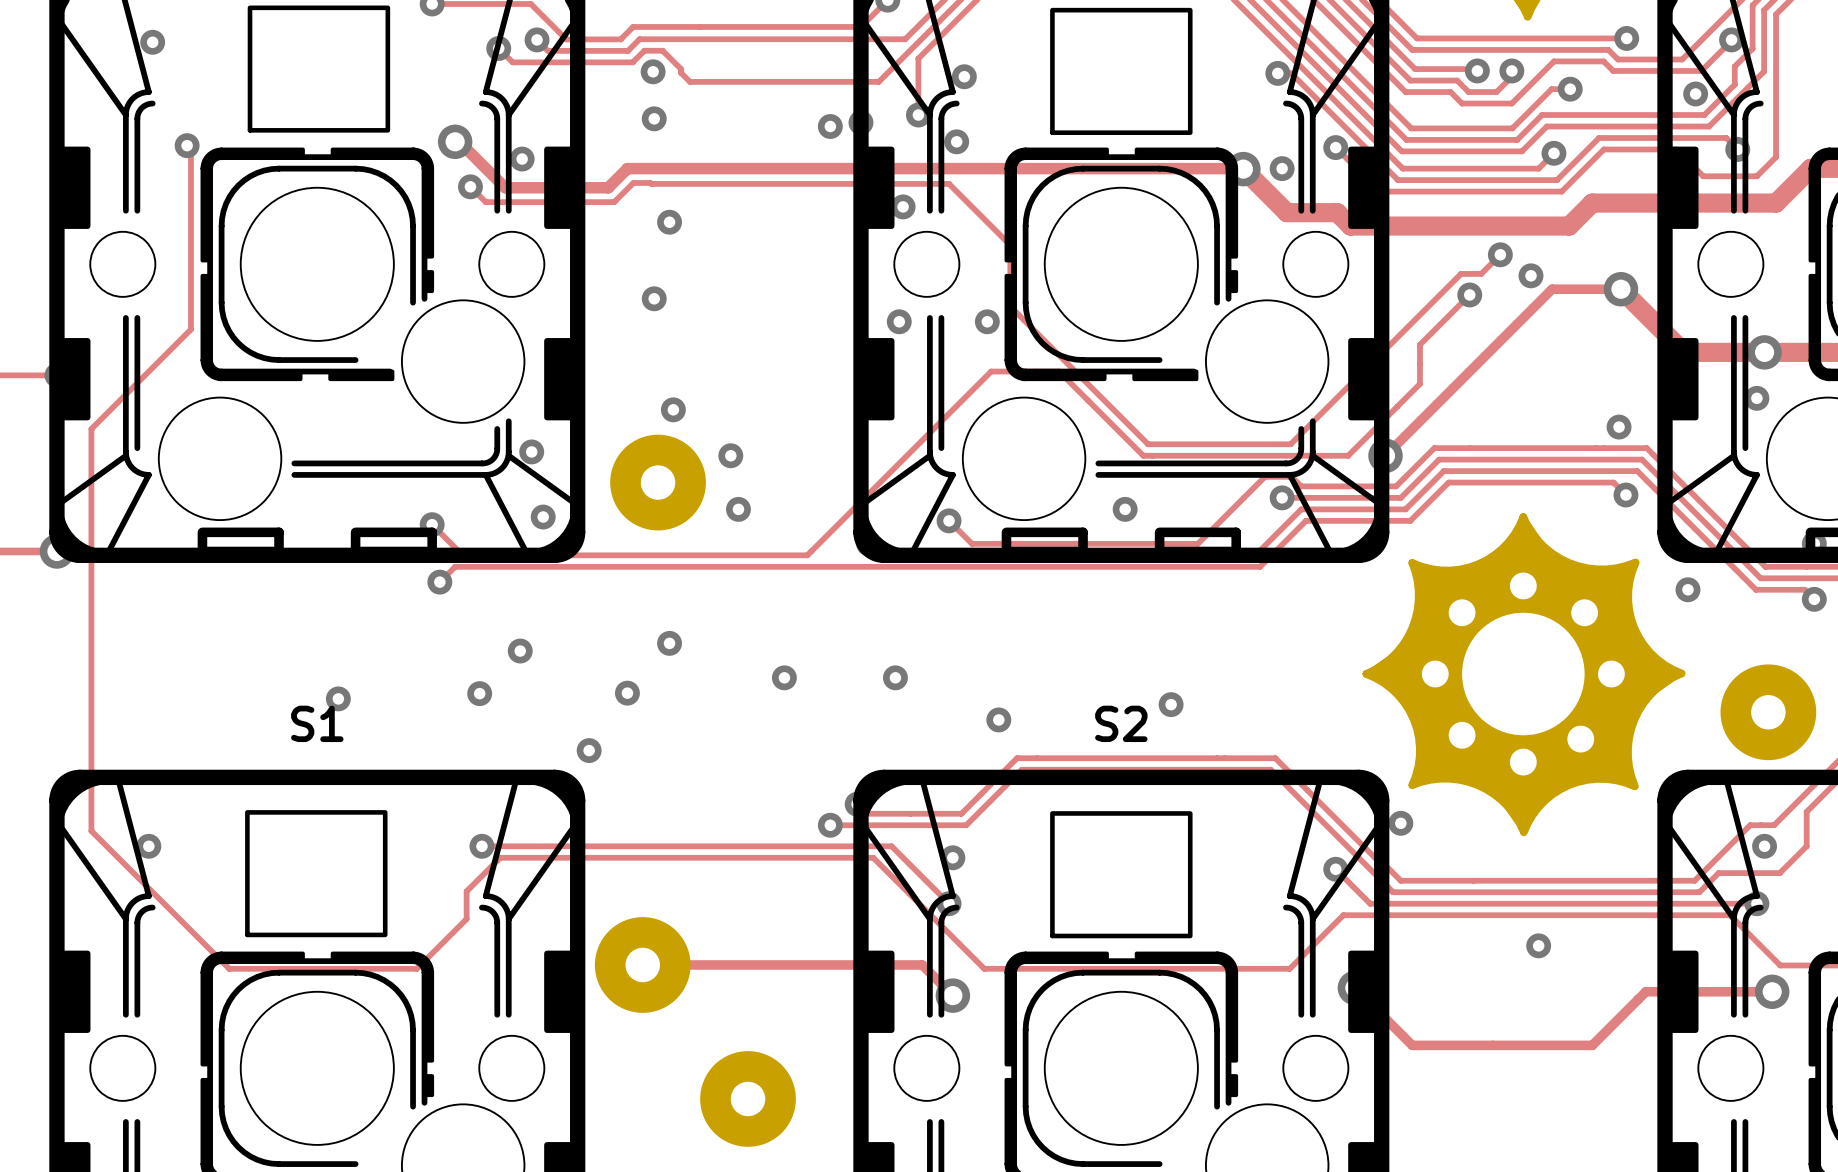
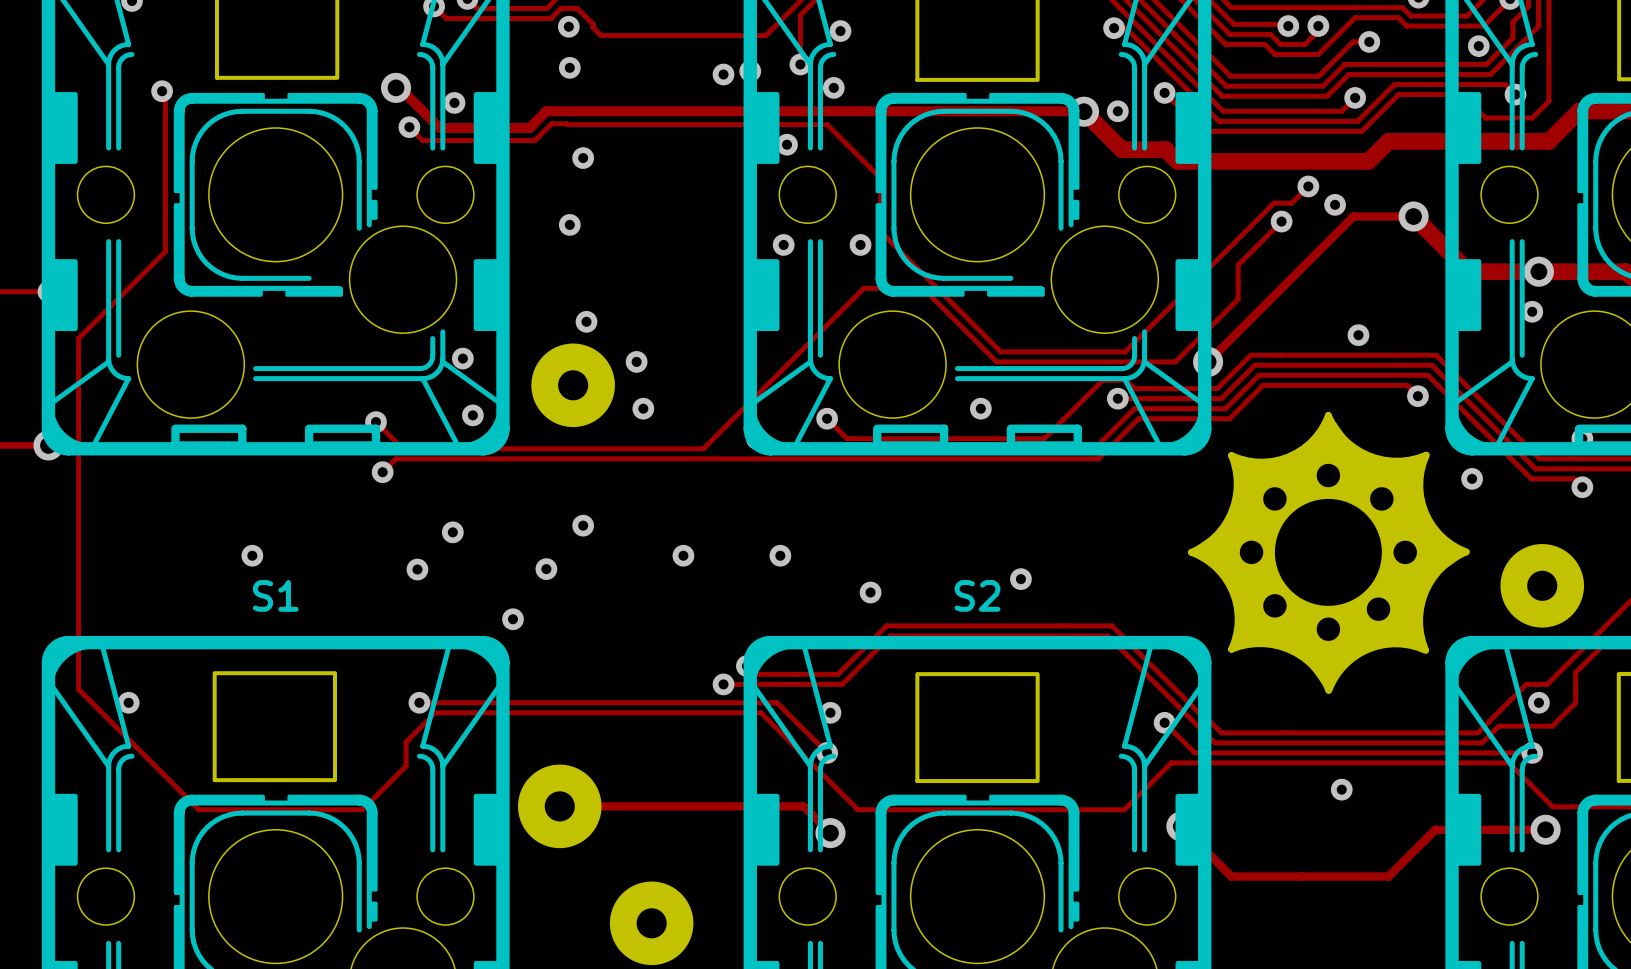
via position: (1619, 427) -> (1358, 335)
via position: (338, 698) -> (252, 555)
via: (1400, 823) -> none

